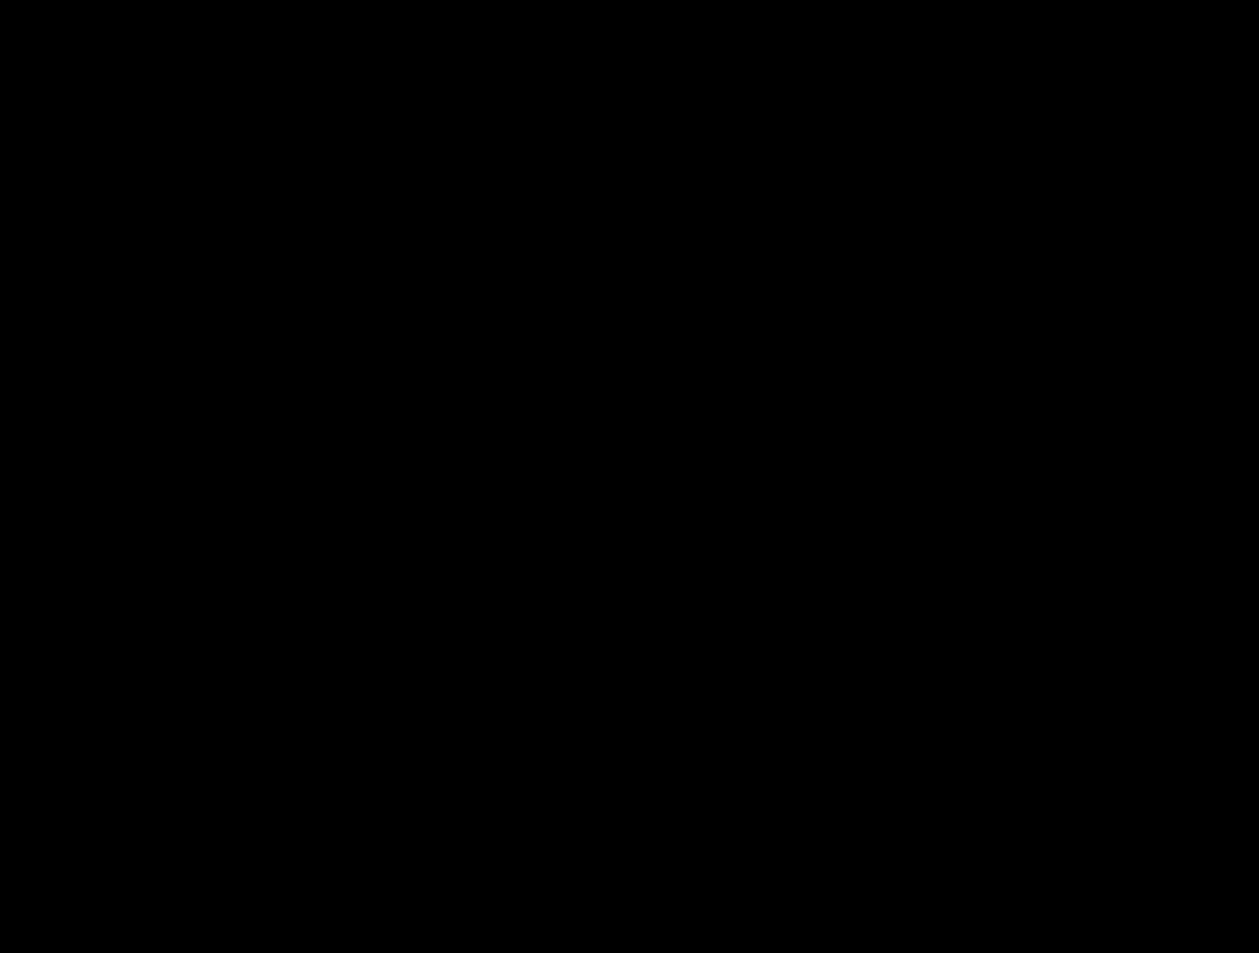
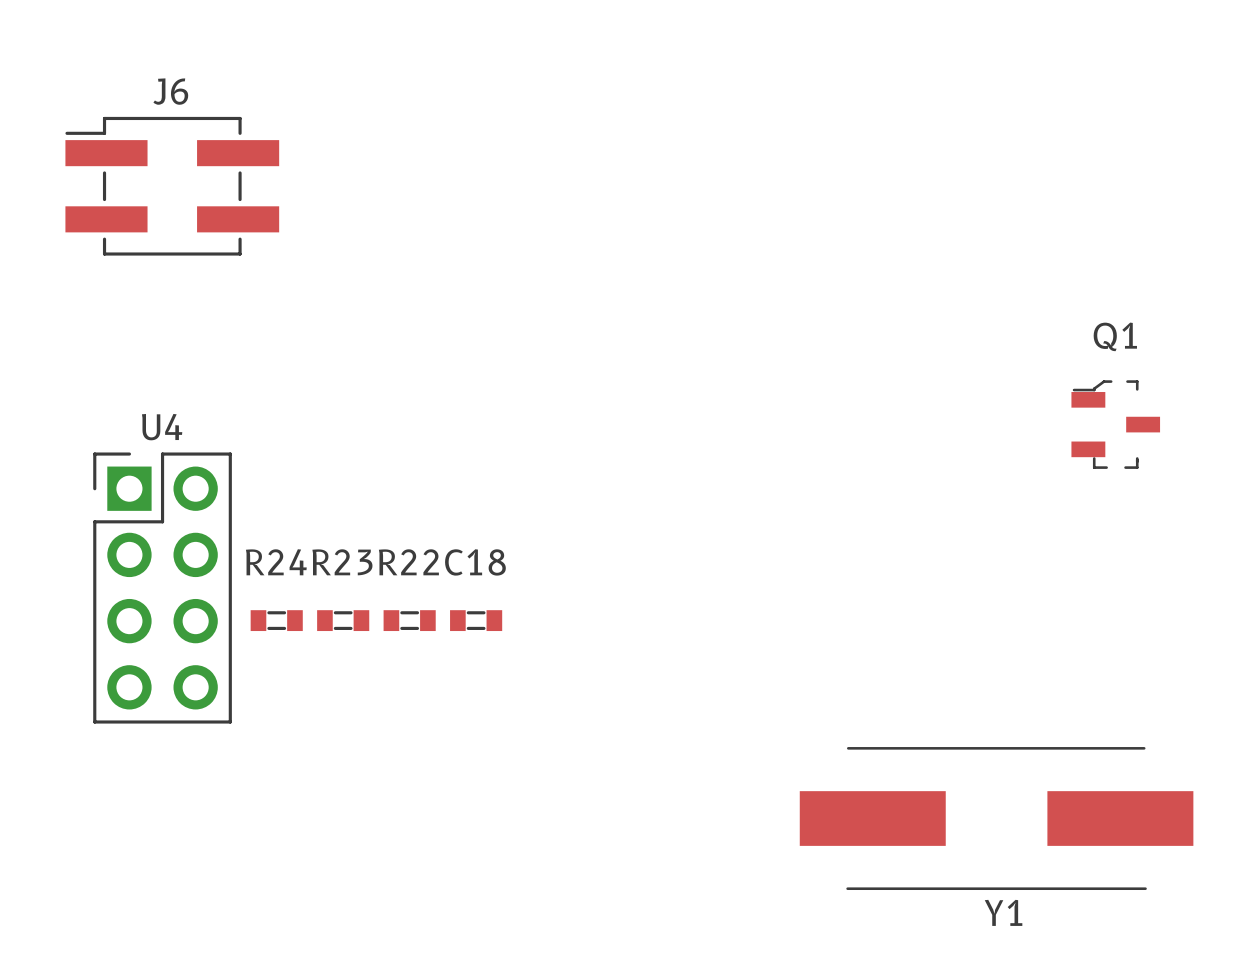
J6: none -> (172, 186)
Q1: none -> (1115, 424)
U4: none -> (162, 588)
R24: none -> (276, 620)
R23: none -> (343, 620)
R22: none -> (409, 620)
C18: none -> (476, 620)
Y1: none -> (996, 818)

